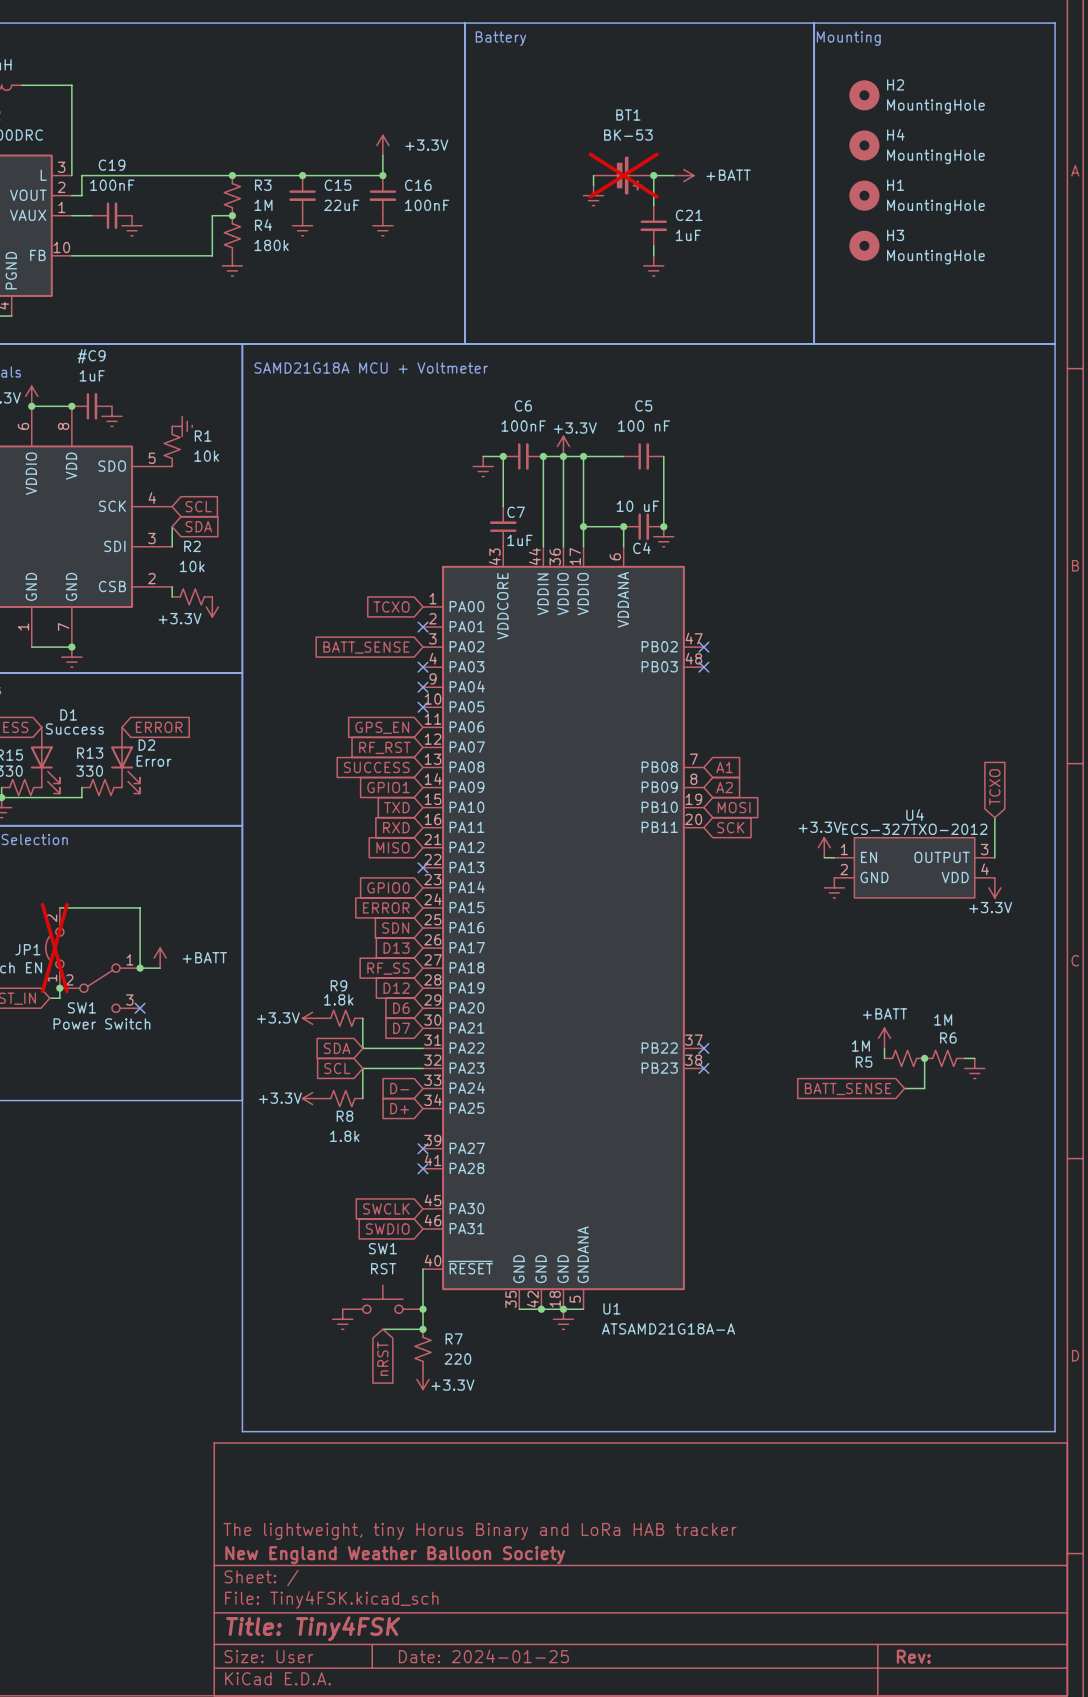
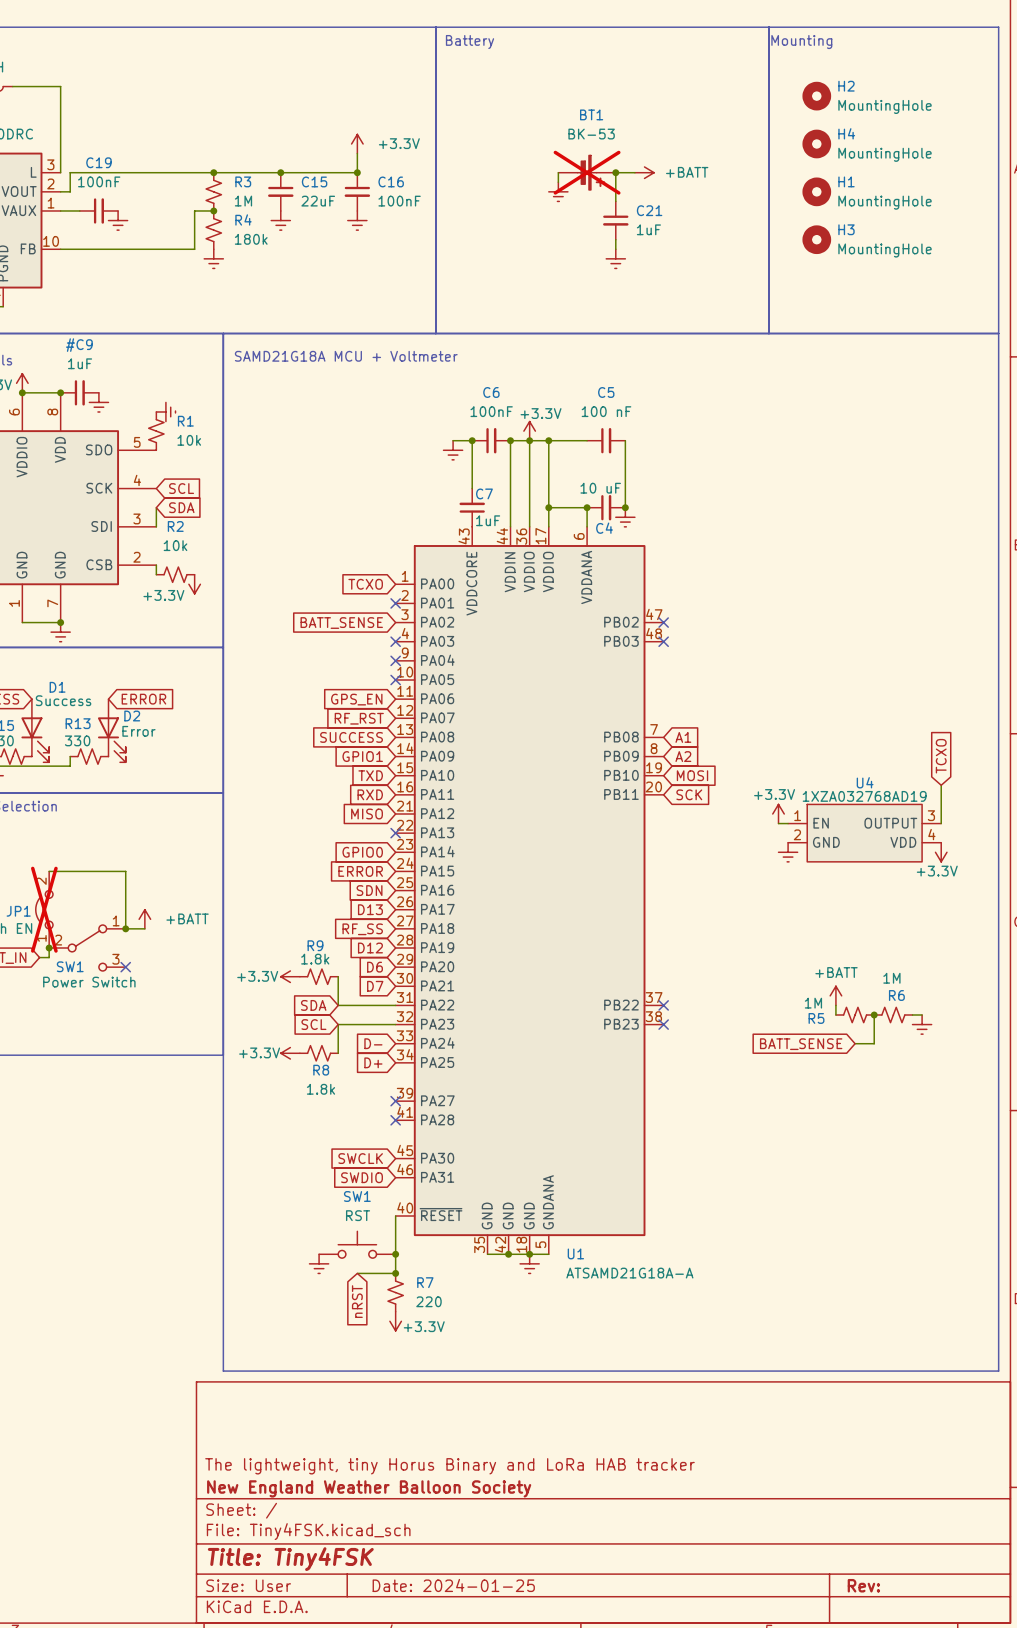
U4 value: ECS-327TXO-2012 (914, 829) -> 1XZA032768AD19 (864, 796)

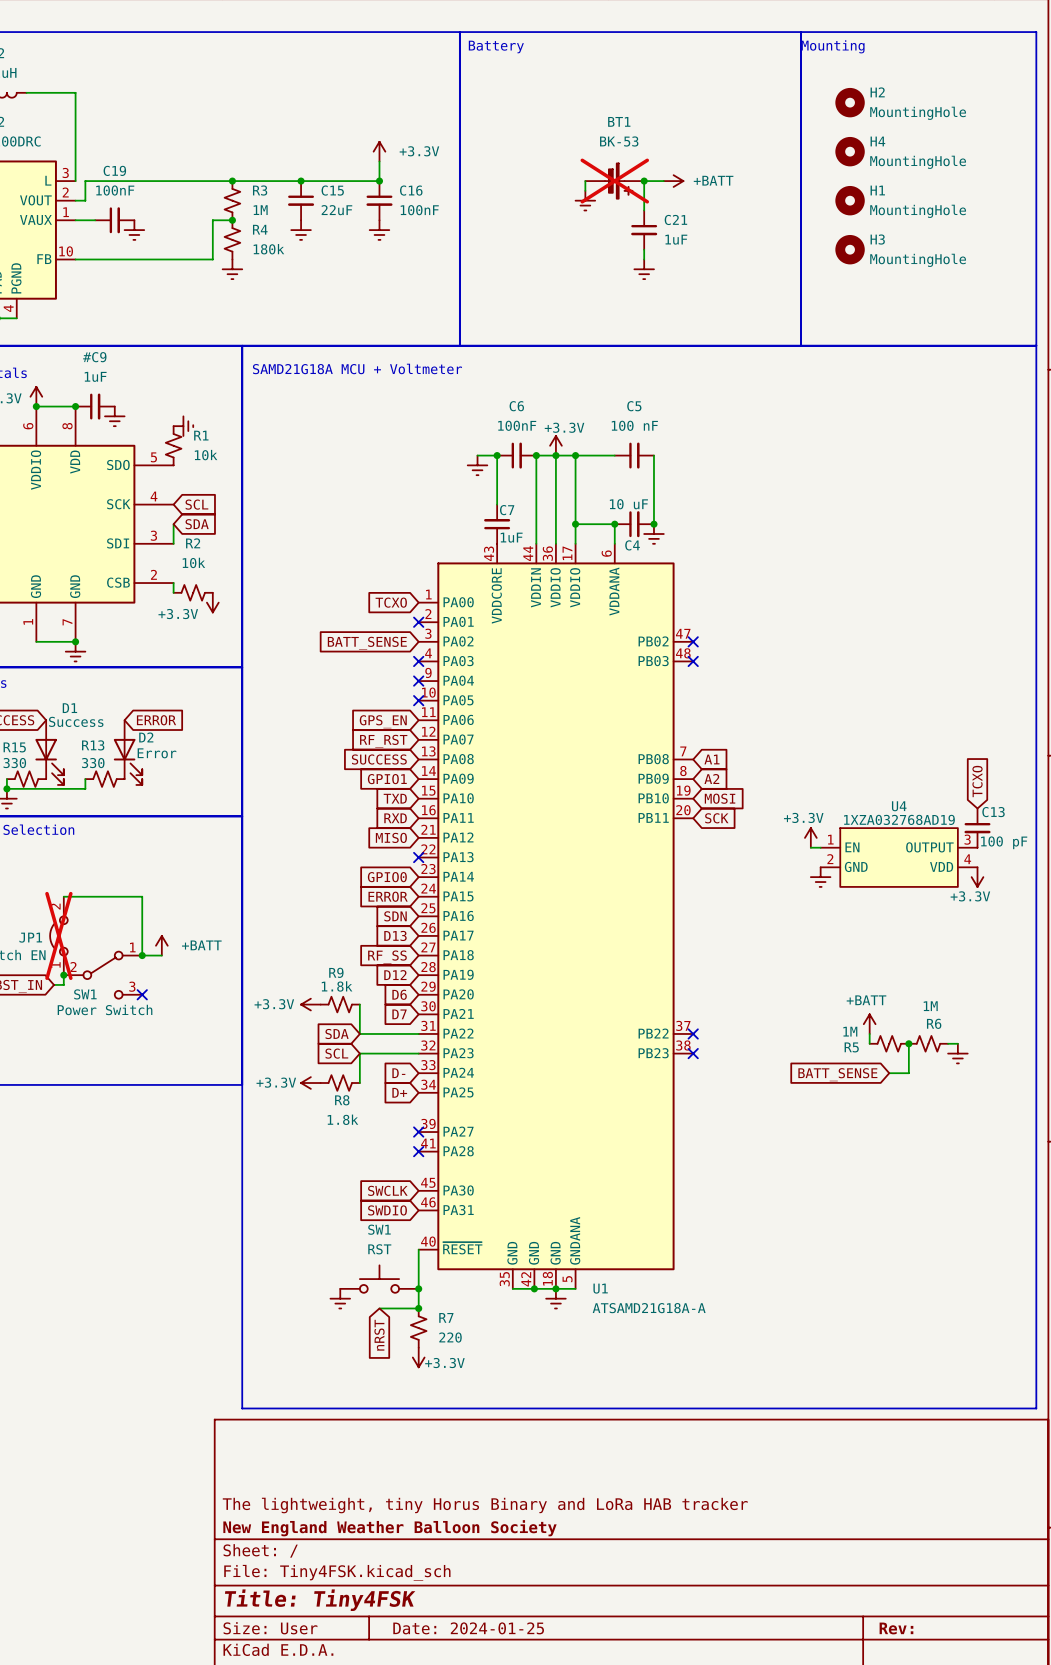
C13: none -> 100 pF (977, 828)

